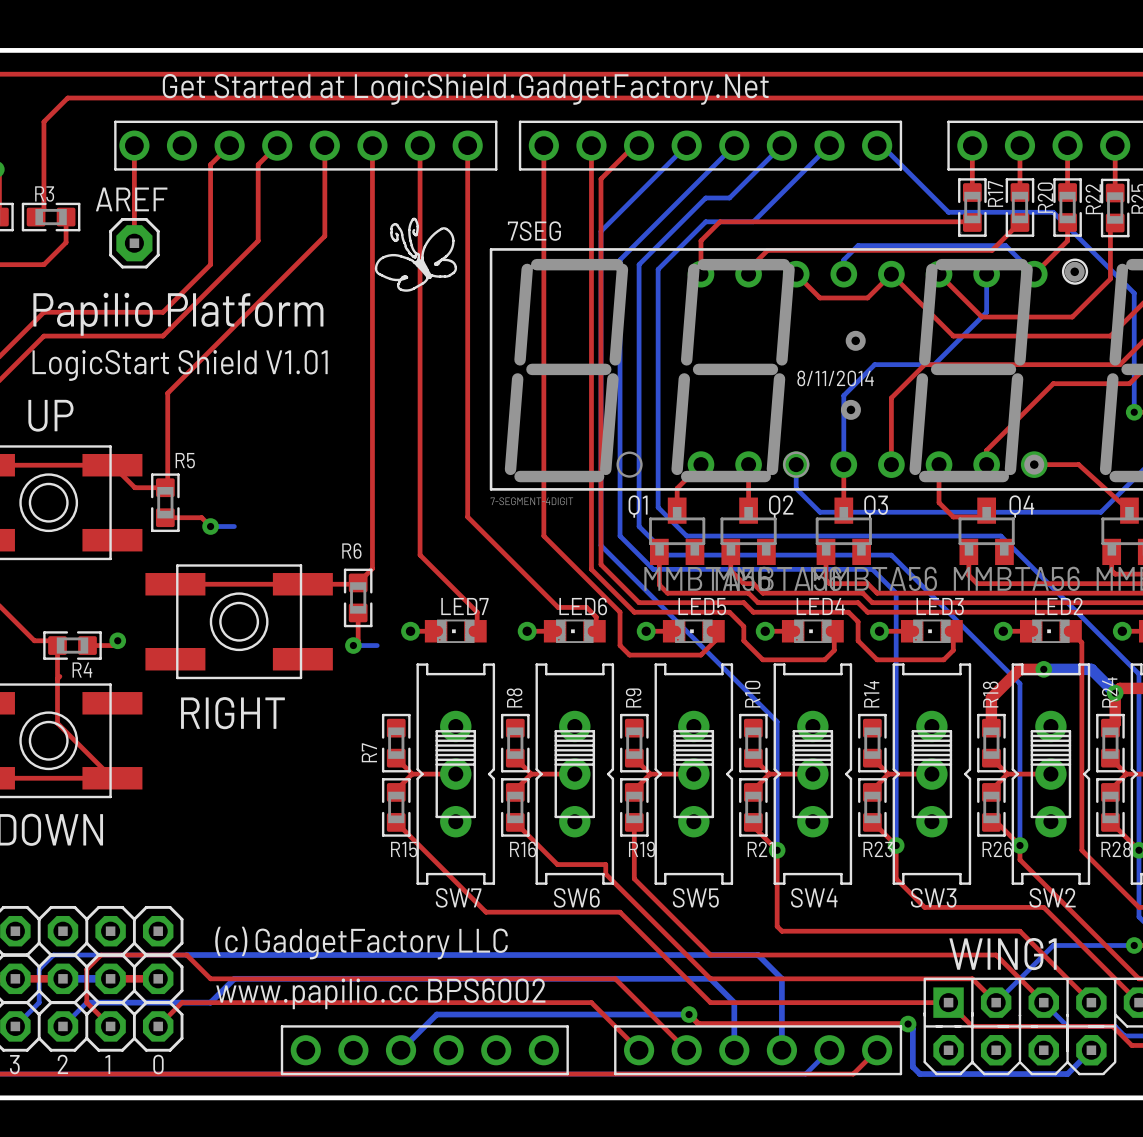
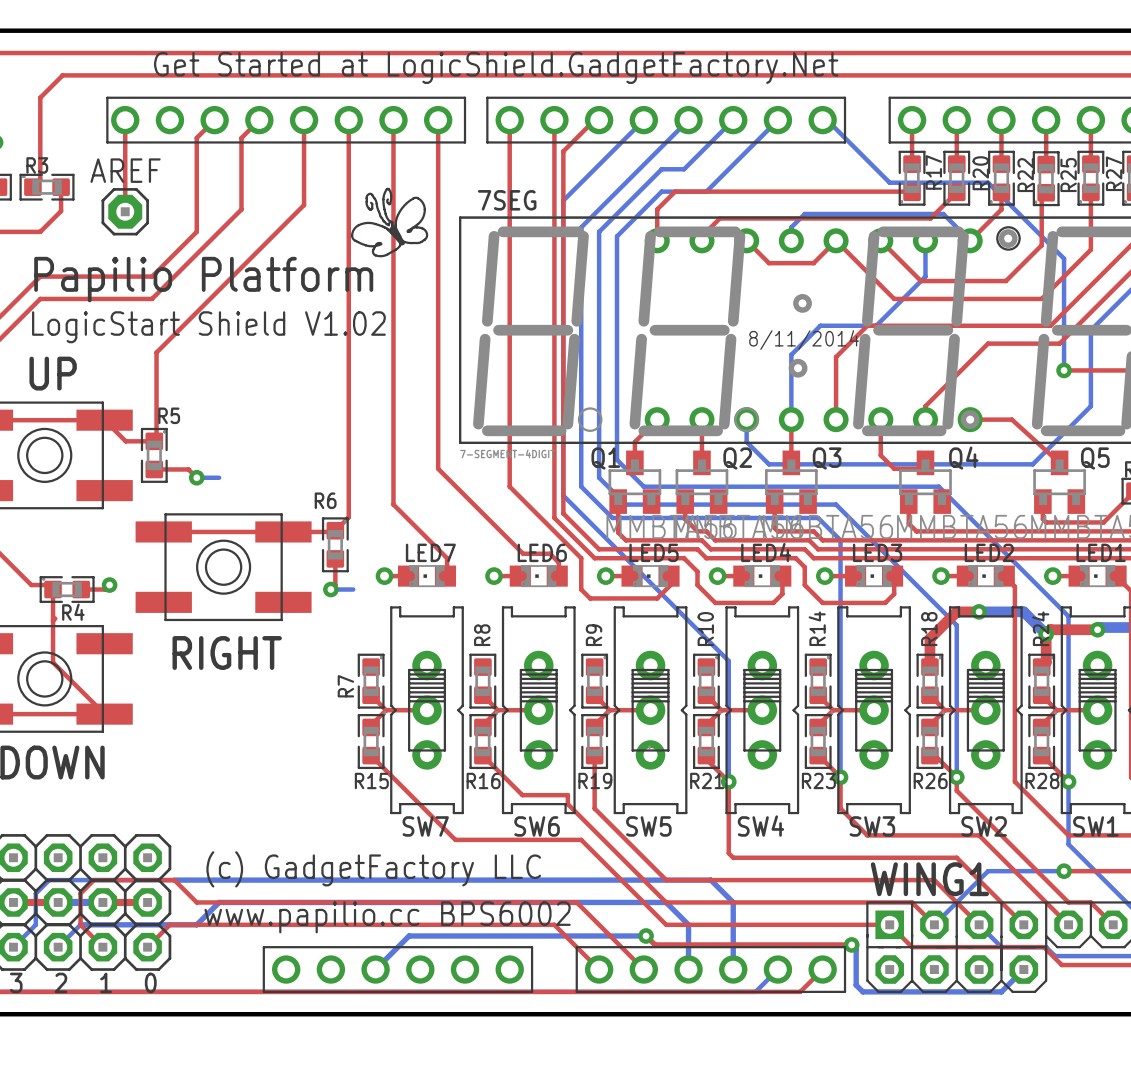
text: LogicStart Shield V1.01 (180, 365) -> LogicStart Shield V1.02 (208, 327)

